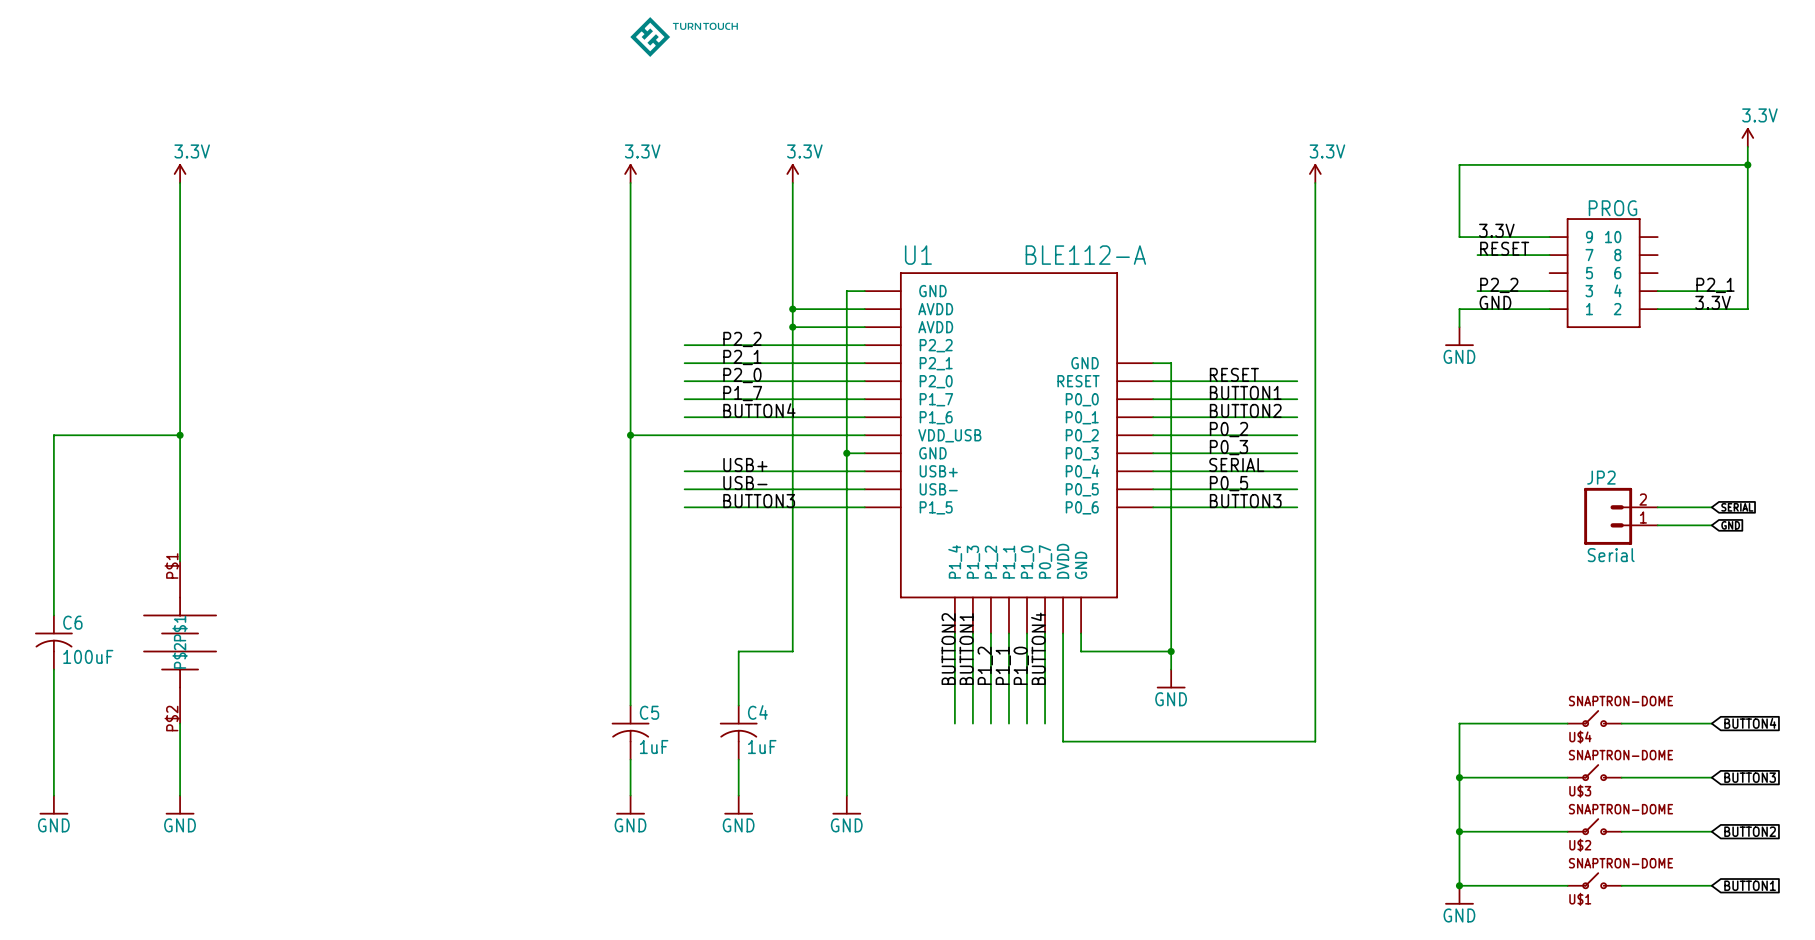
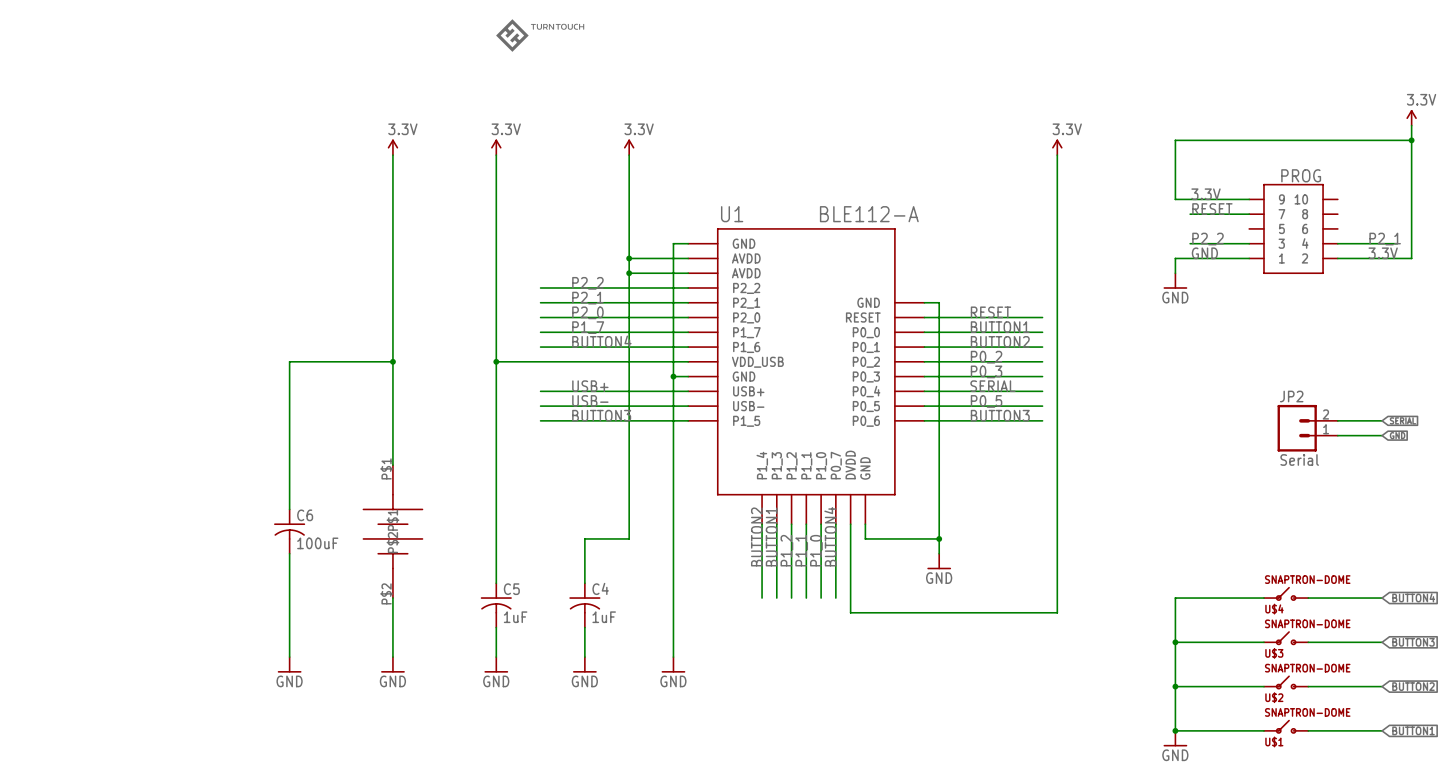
power symbol: 3.3V (180, 173) -> none
power symbol: none -> 3.3V (392, 147)
wire: (180, 182) (180, 561) -> none
wire: none -> (392, 155) (392, 465)
wire: (180, 435) (53, 435) (53, 615) -> none
junction: (180, 435) -> none
wire: none -> (392, 361) (289, 361) (289, 509)
junction: none -> (392, 361)
C6 position: (53, 642) -> (289, 531)
part: (180, 642) -> none
part: none -> (392, 531)
wire: (53, 669) (53, 795) -> none
wire: none -> (289, 553) (289, 657)
wire: (180, 723) (180, 795) -> none
wire: none -> (392, 598) (392, 657)
power symbol: GND (53, 805) -> none
power symbol: GND (180, 805) -> none
power symbol: none -> GND (289, 664)
power symbol: none -> GND (392, 664)

